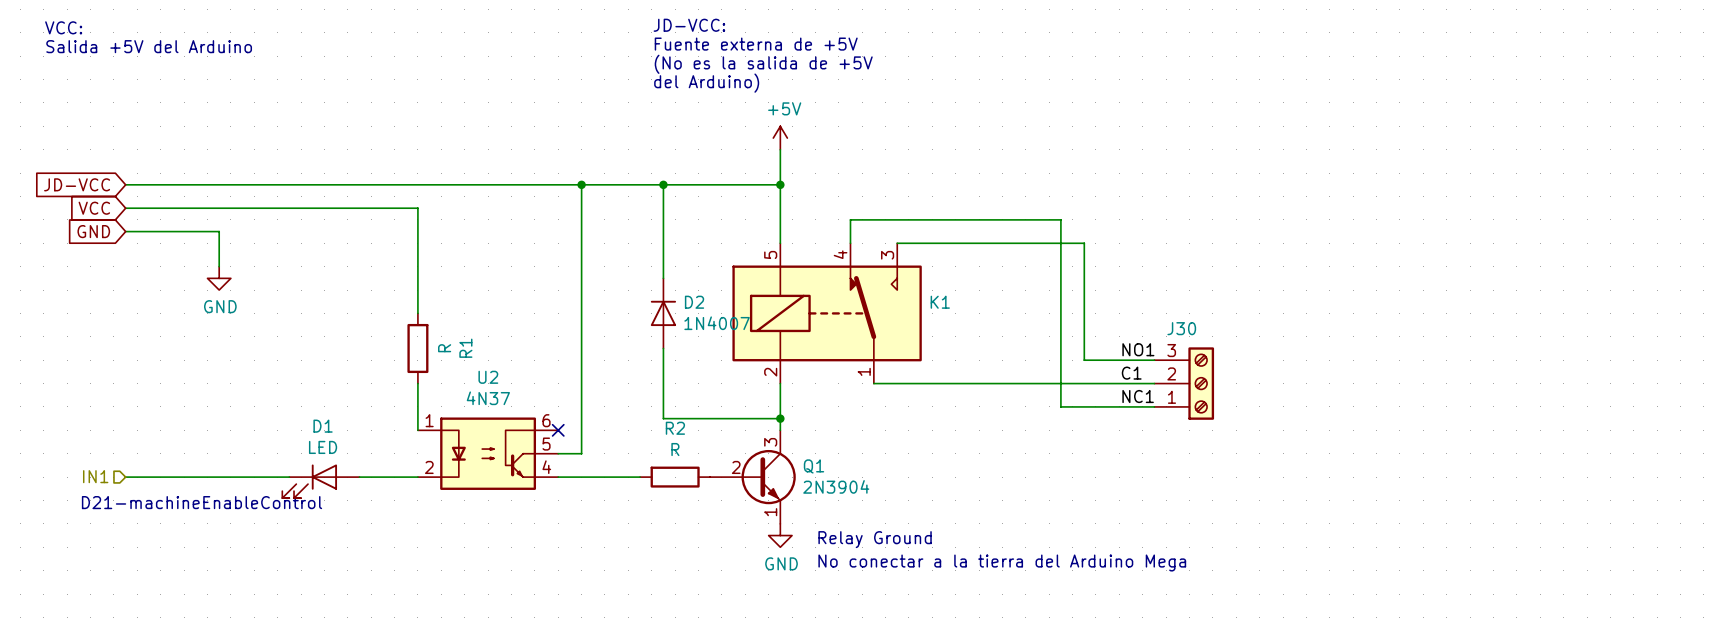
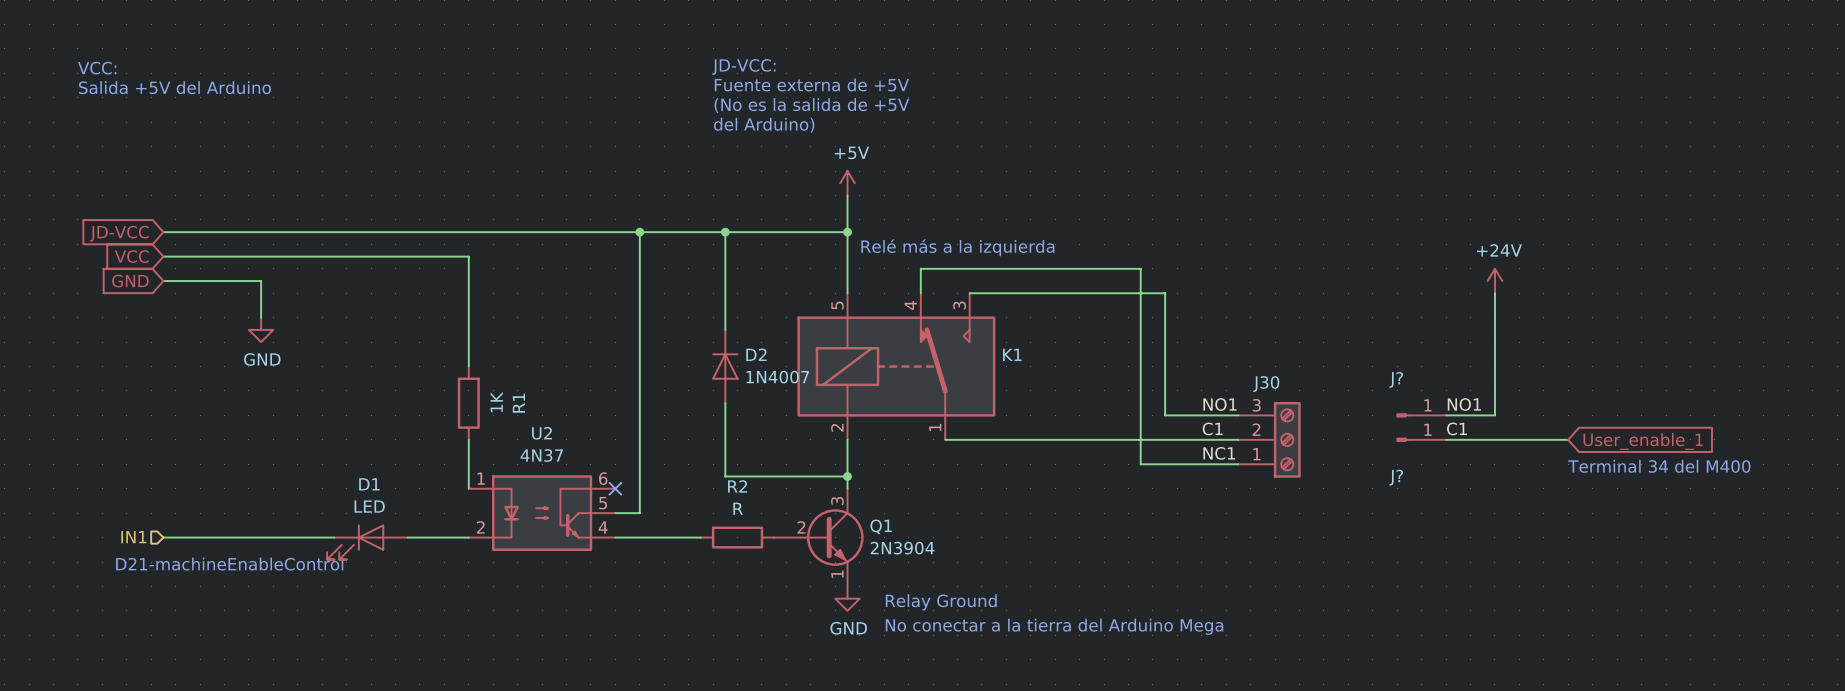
text: none -> Relé más a la izquierda (957, 247)
power symbol: none -> +24V (1494, 281)
wire: none -> (1494, 293) (1494, 415) (1446, 415)
R1 value: R (444, 348) -> 1K (496, 402)
label: none -> NO1 (1464, 404)
J?: none -> (1421, 415)
label: none -> C1 (1456, 428)
J?: none -> (1421, 439)
wire: none -> (1446, 439) (1568, 439)
global label: none -> User_enable_1 (1643, 441)
text: none -> Terminal 34 del M400 (1659, 466)

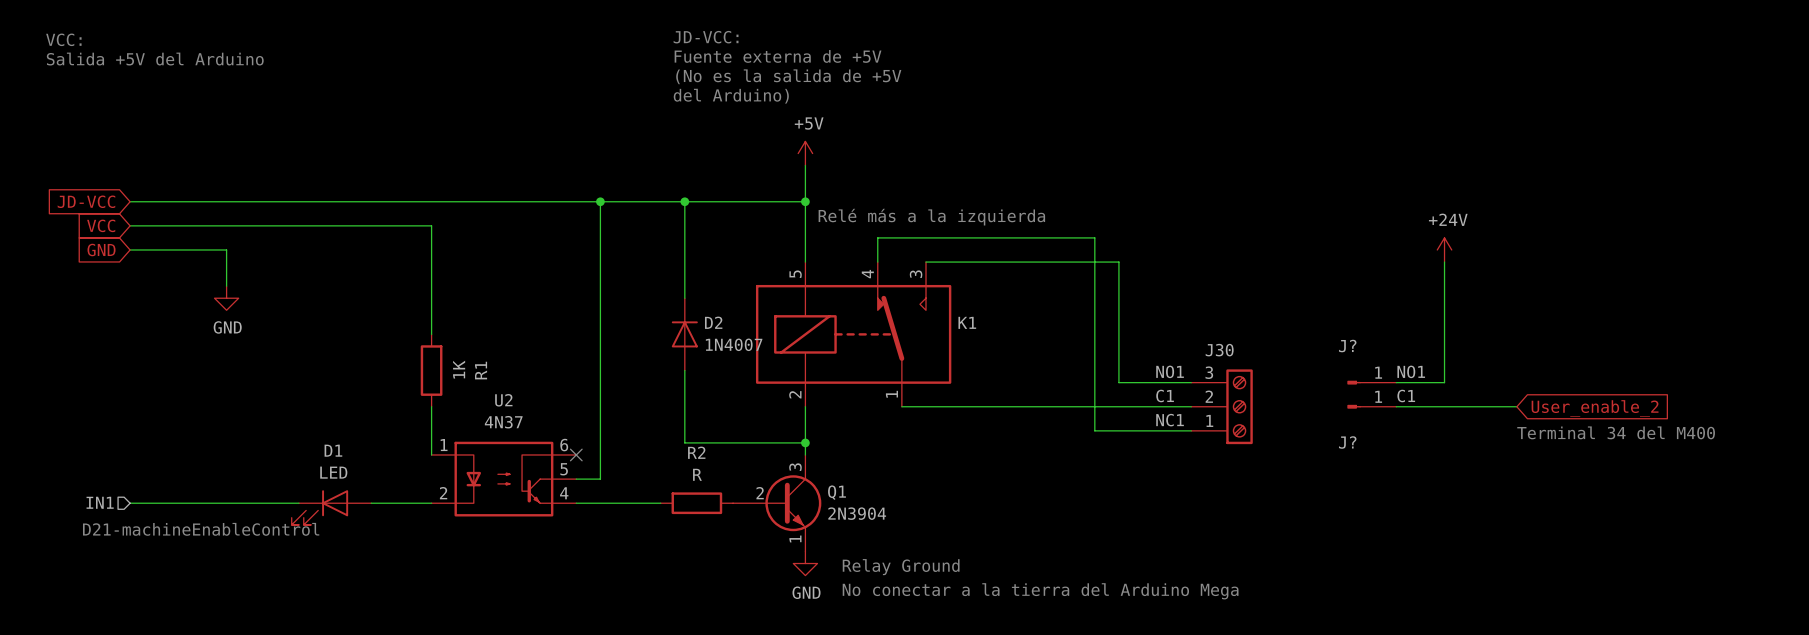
global label: User_enable_1 (1643, 441) -> User_enable_2 (1595, 408)

